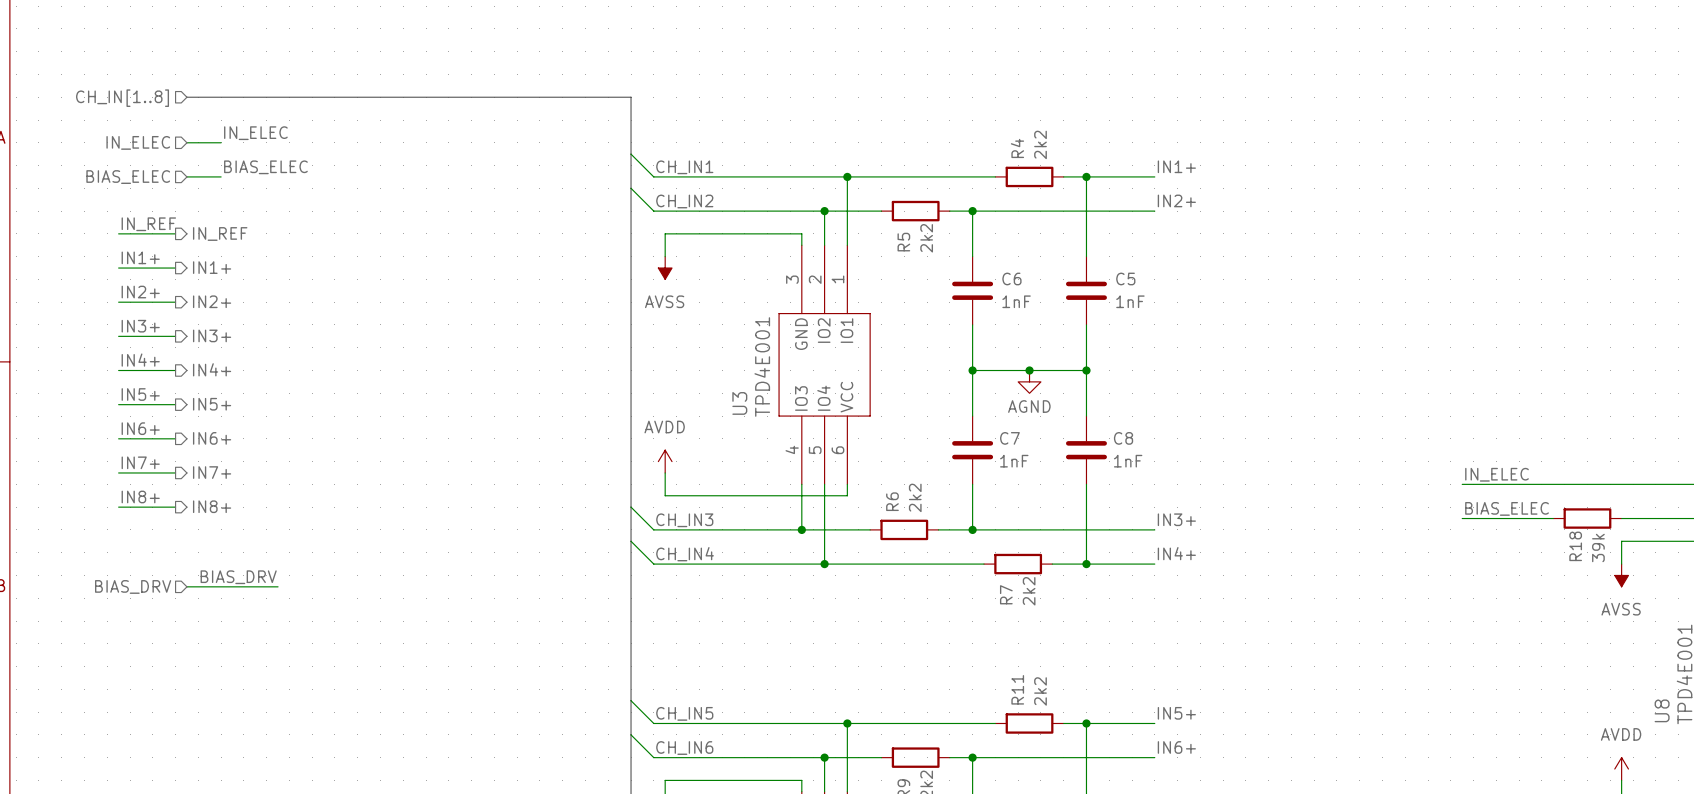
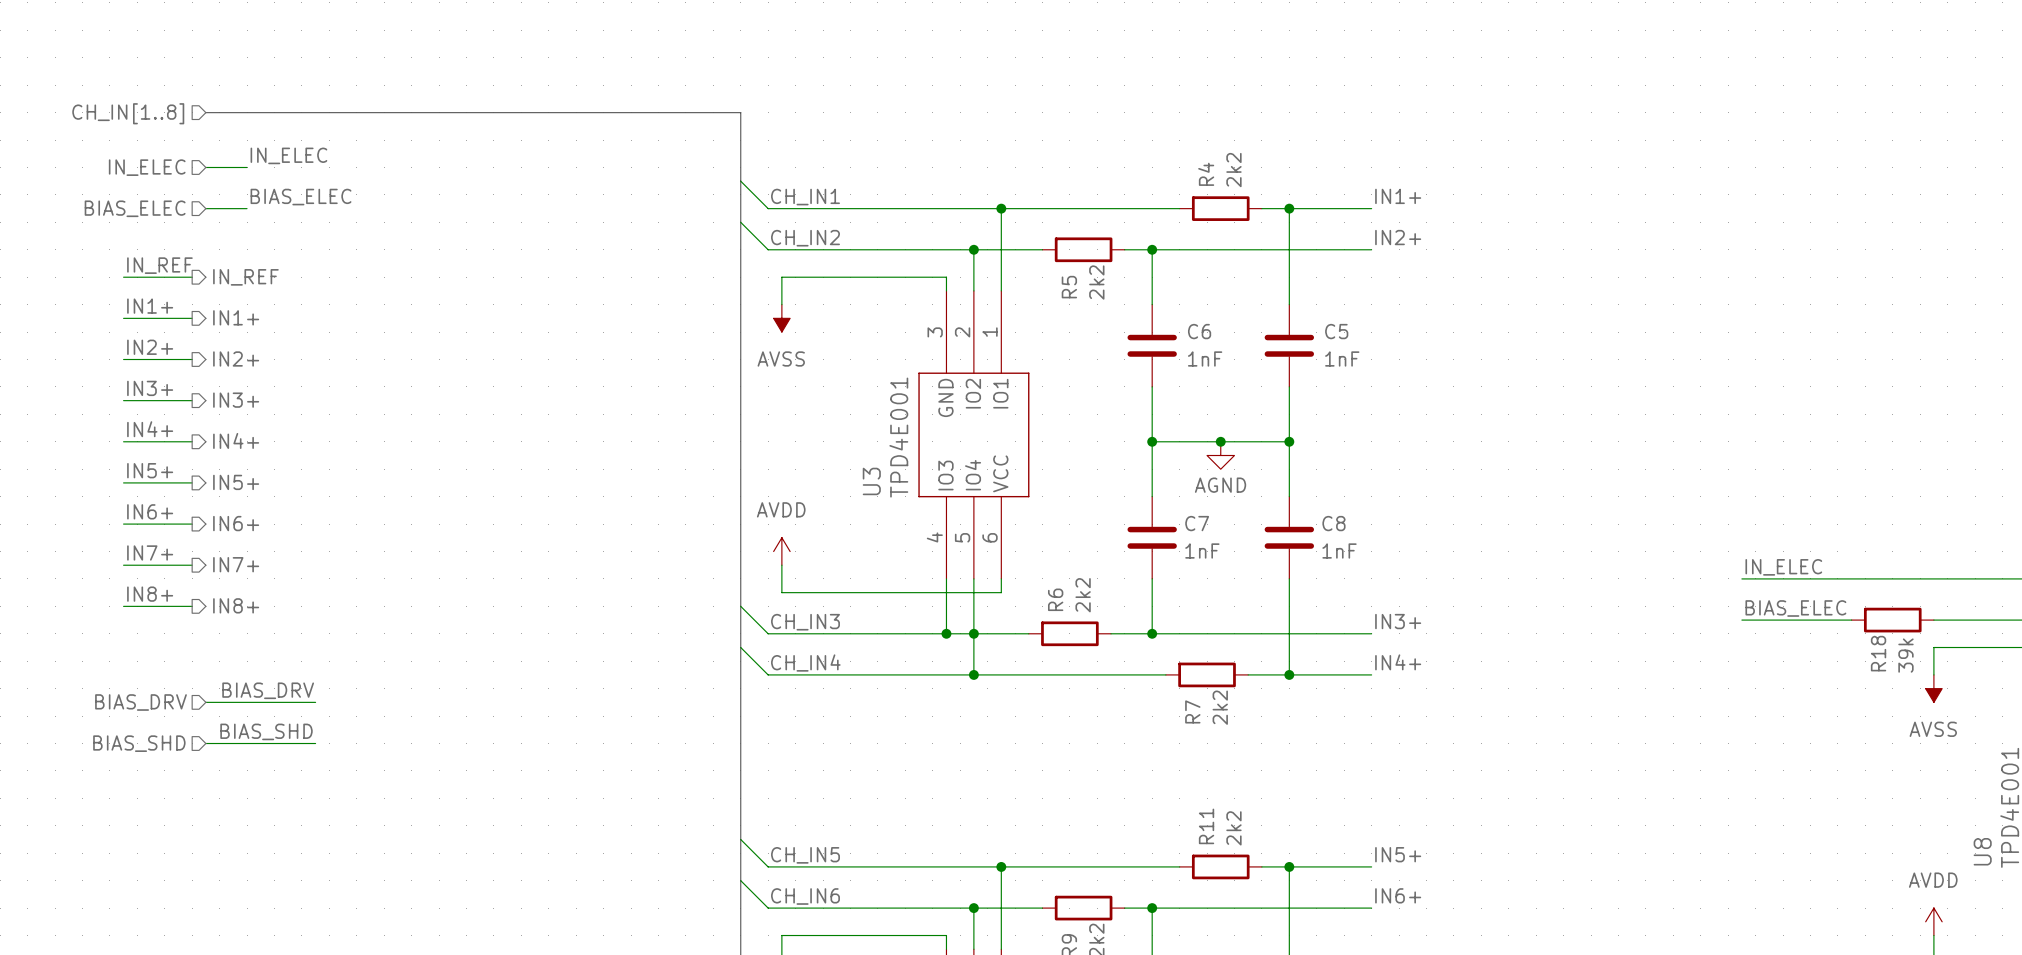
junction: none -> (973, 633)
label: none -> BIAS_SHD (266, 731)
hierarchical label: none -> BIAS_SHD (139, 743)
wire: none -> (205, 743) (315, 743)

